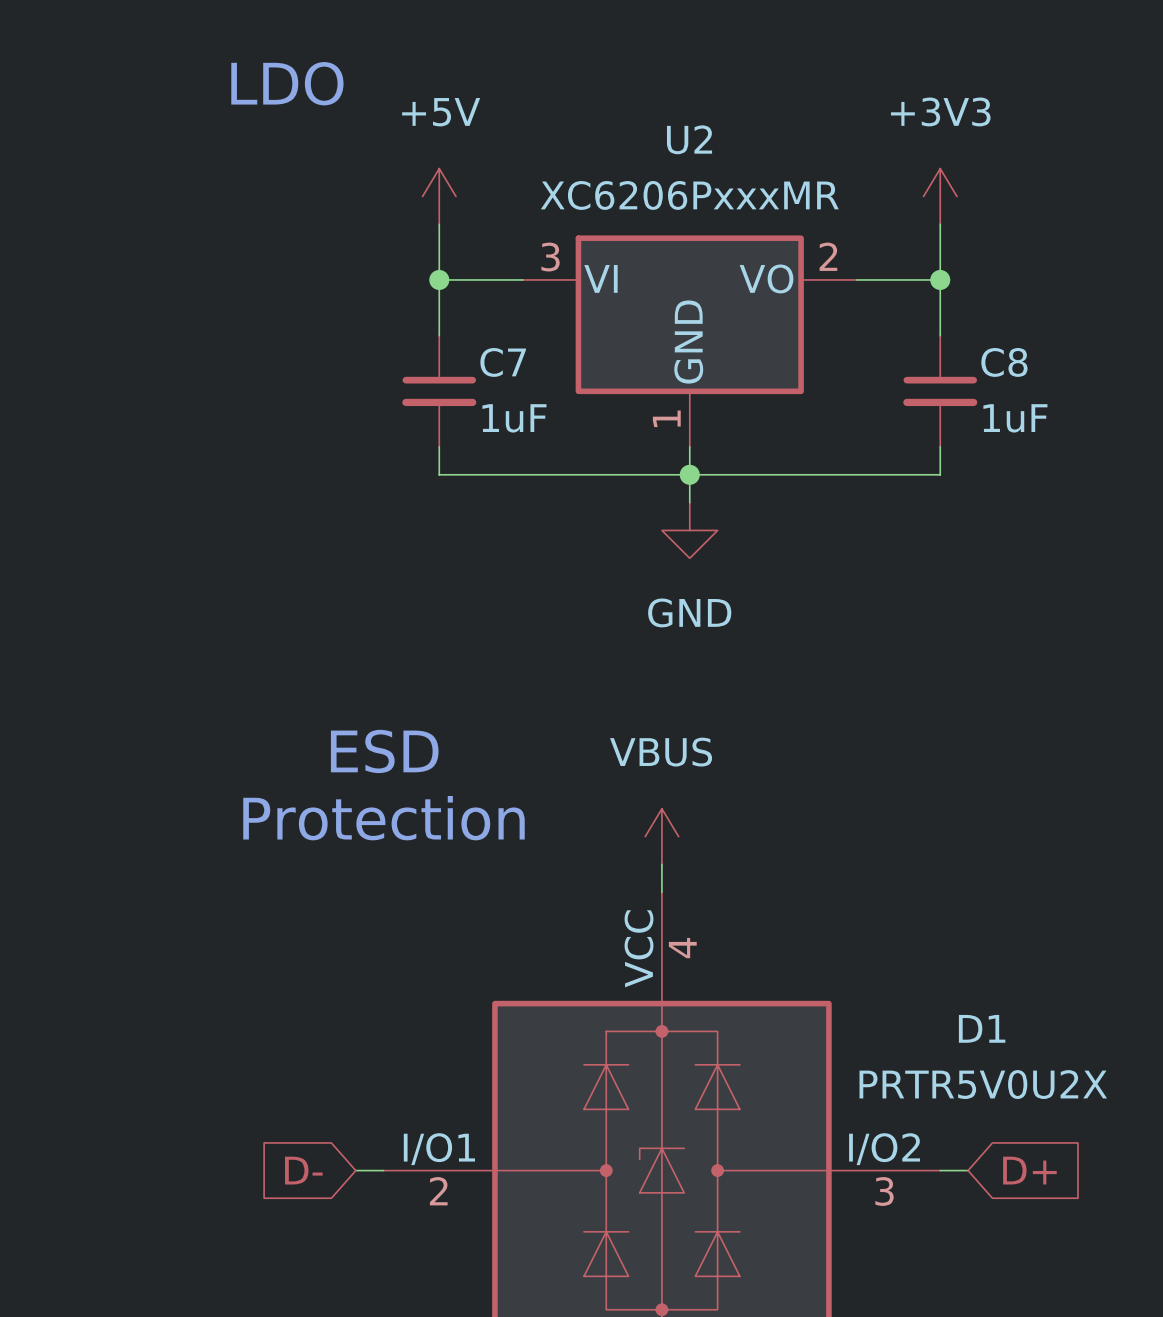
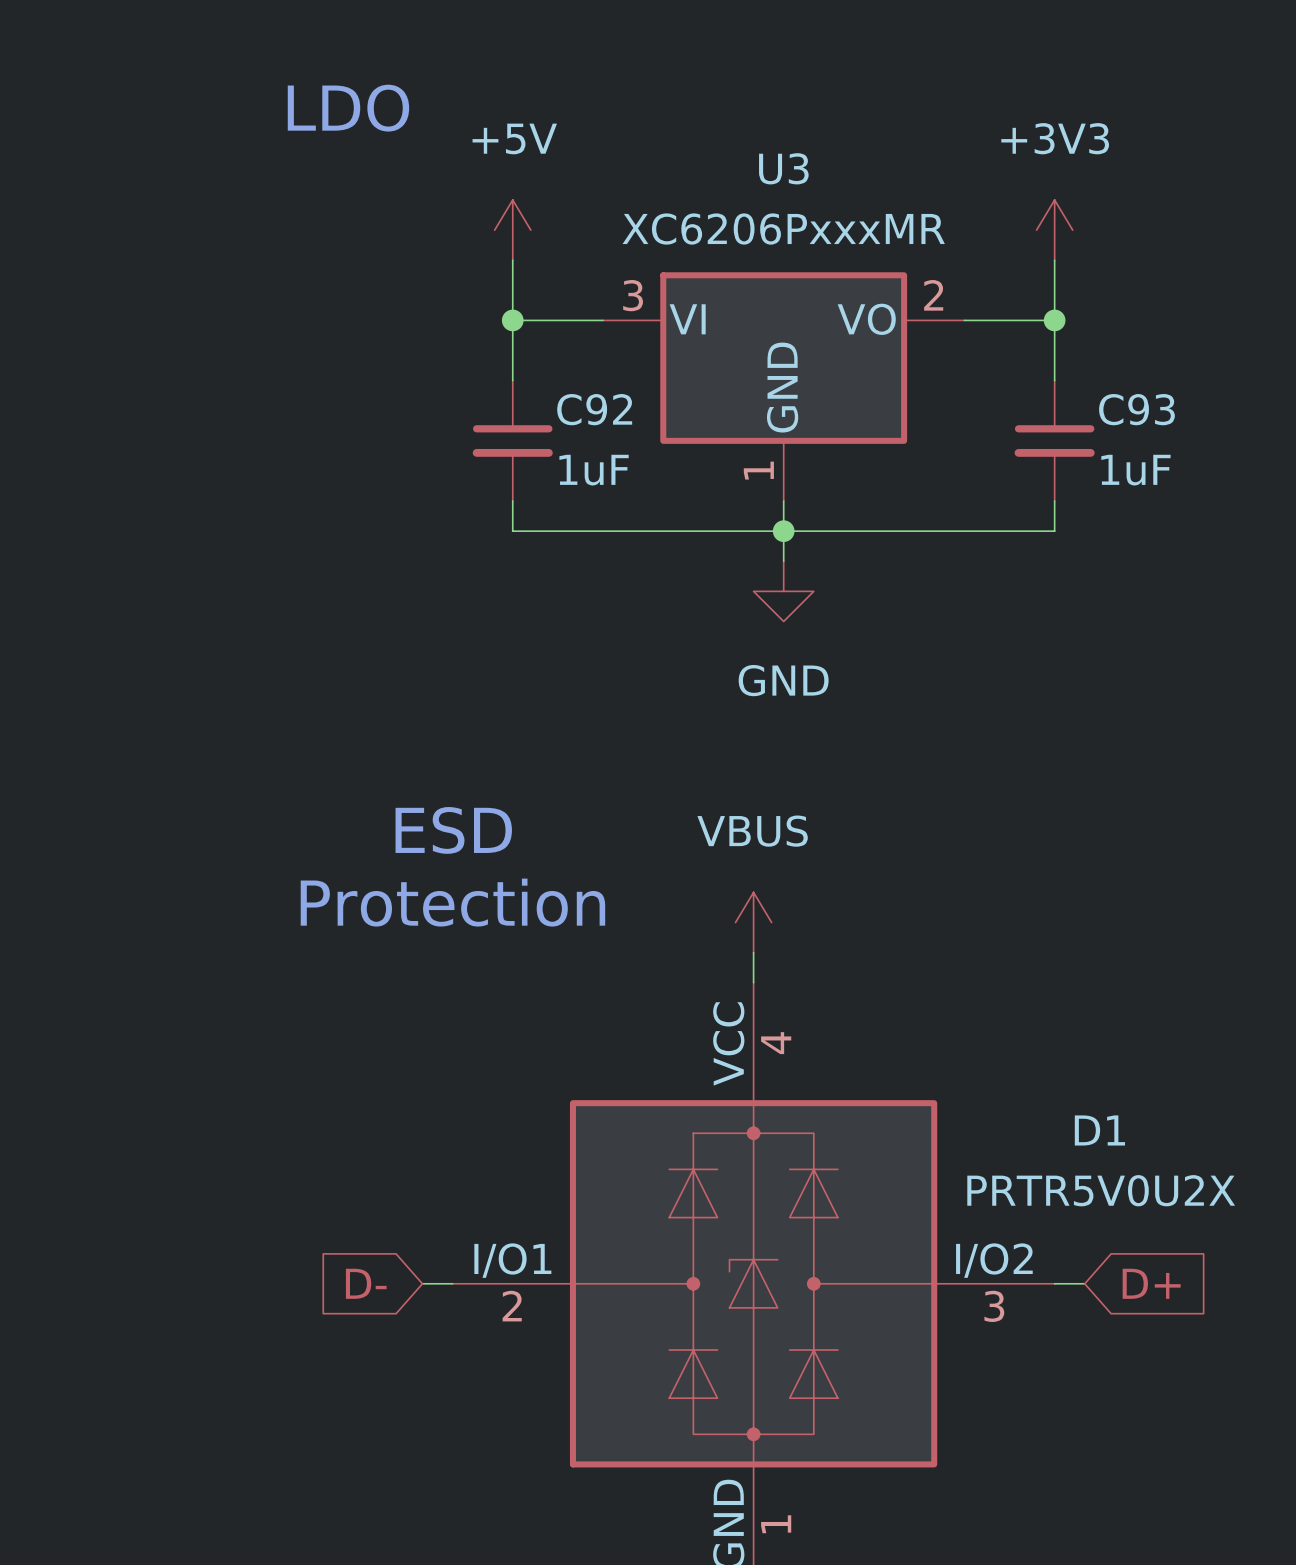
U2 name: U2 (689, 139) -> U3 (783, 168)
C7 name: C7 (503, 362) -> C92 (594, 409)
C8 name: C8 (1004, 362) -> C93 (1136, 409)

